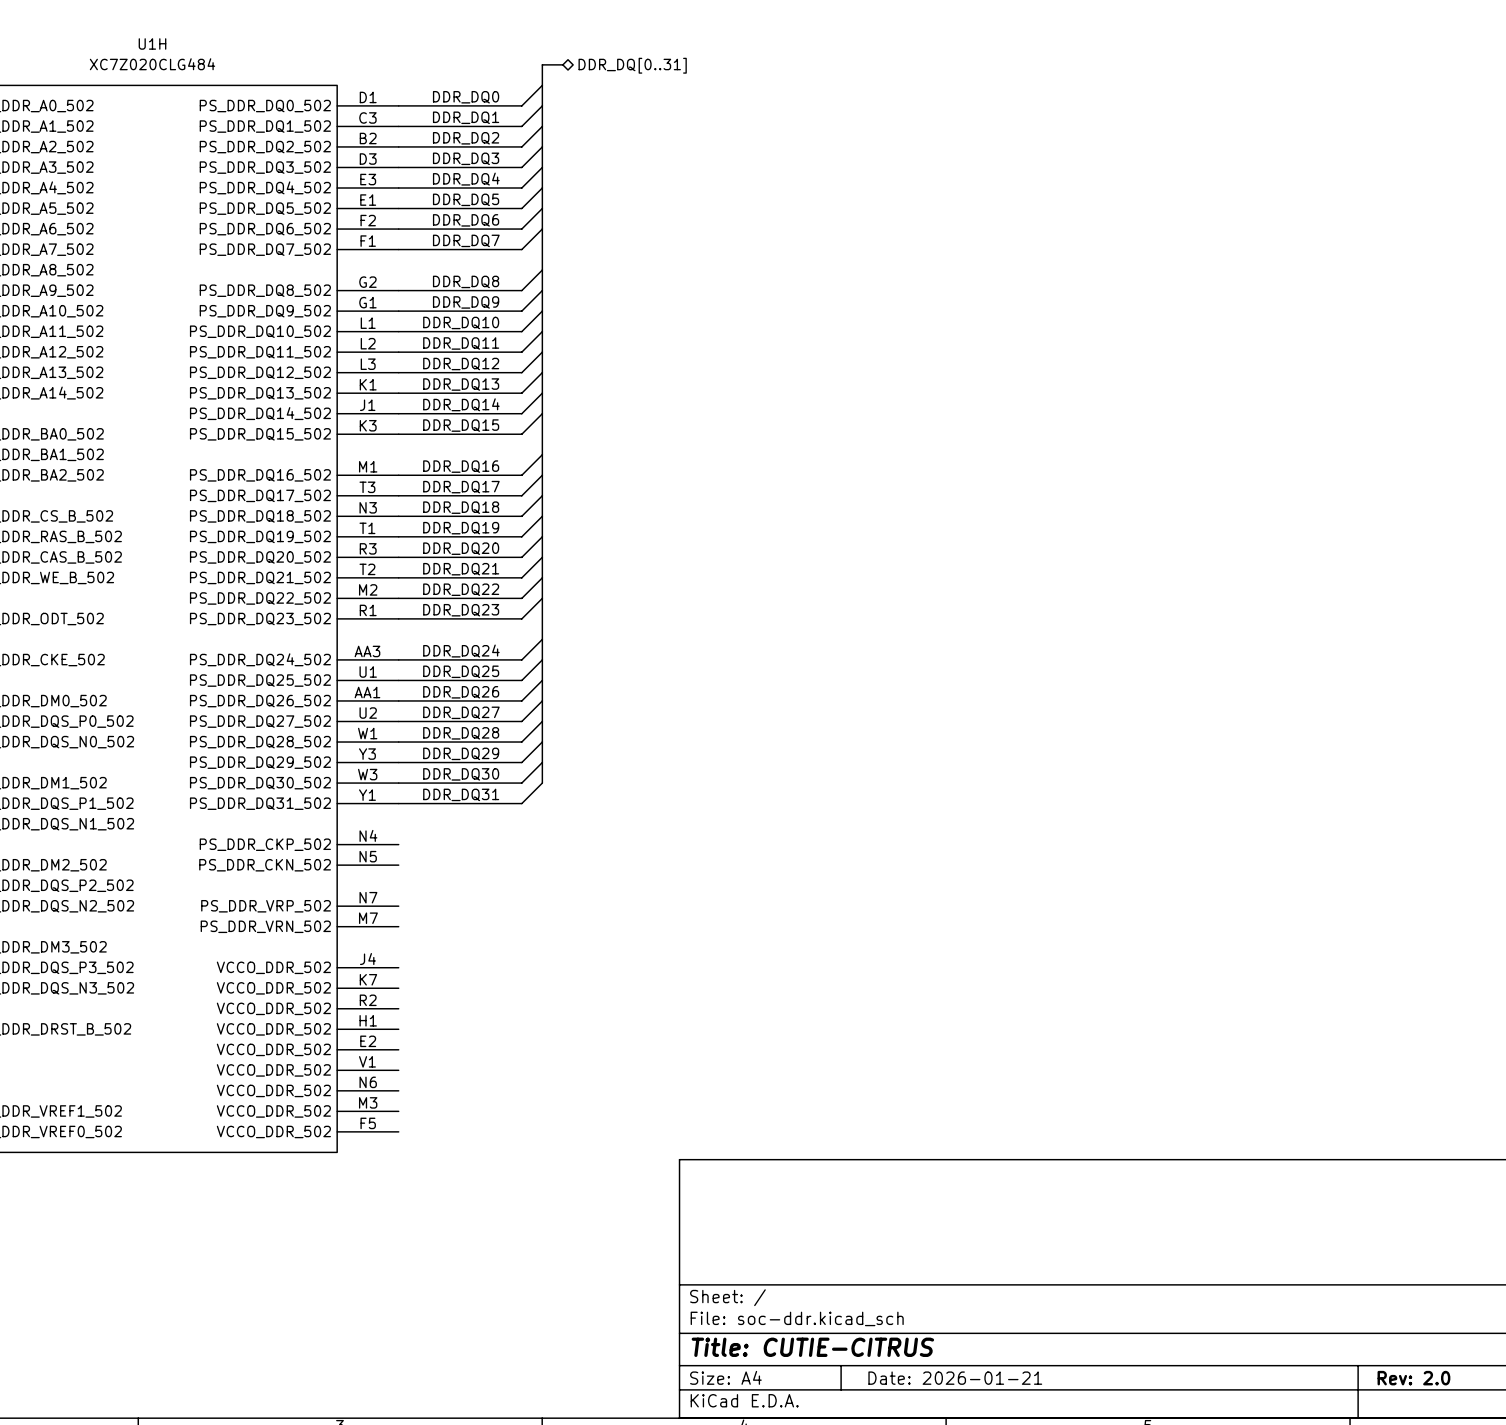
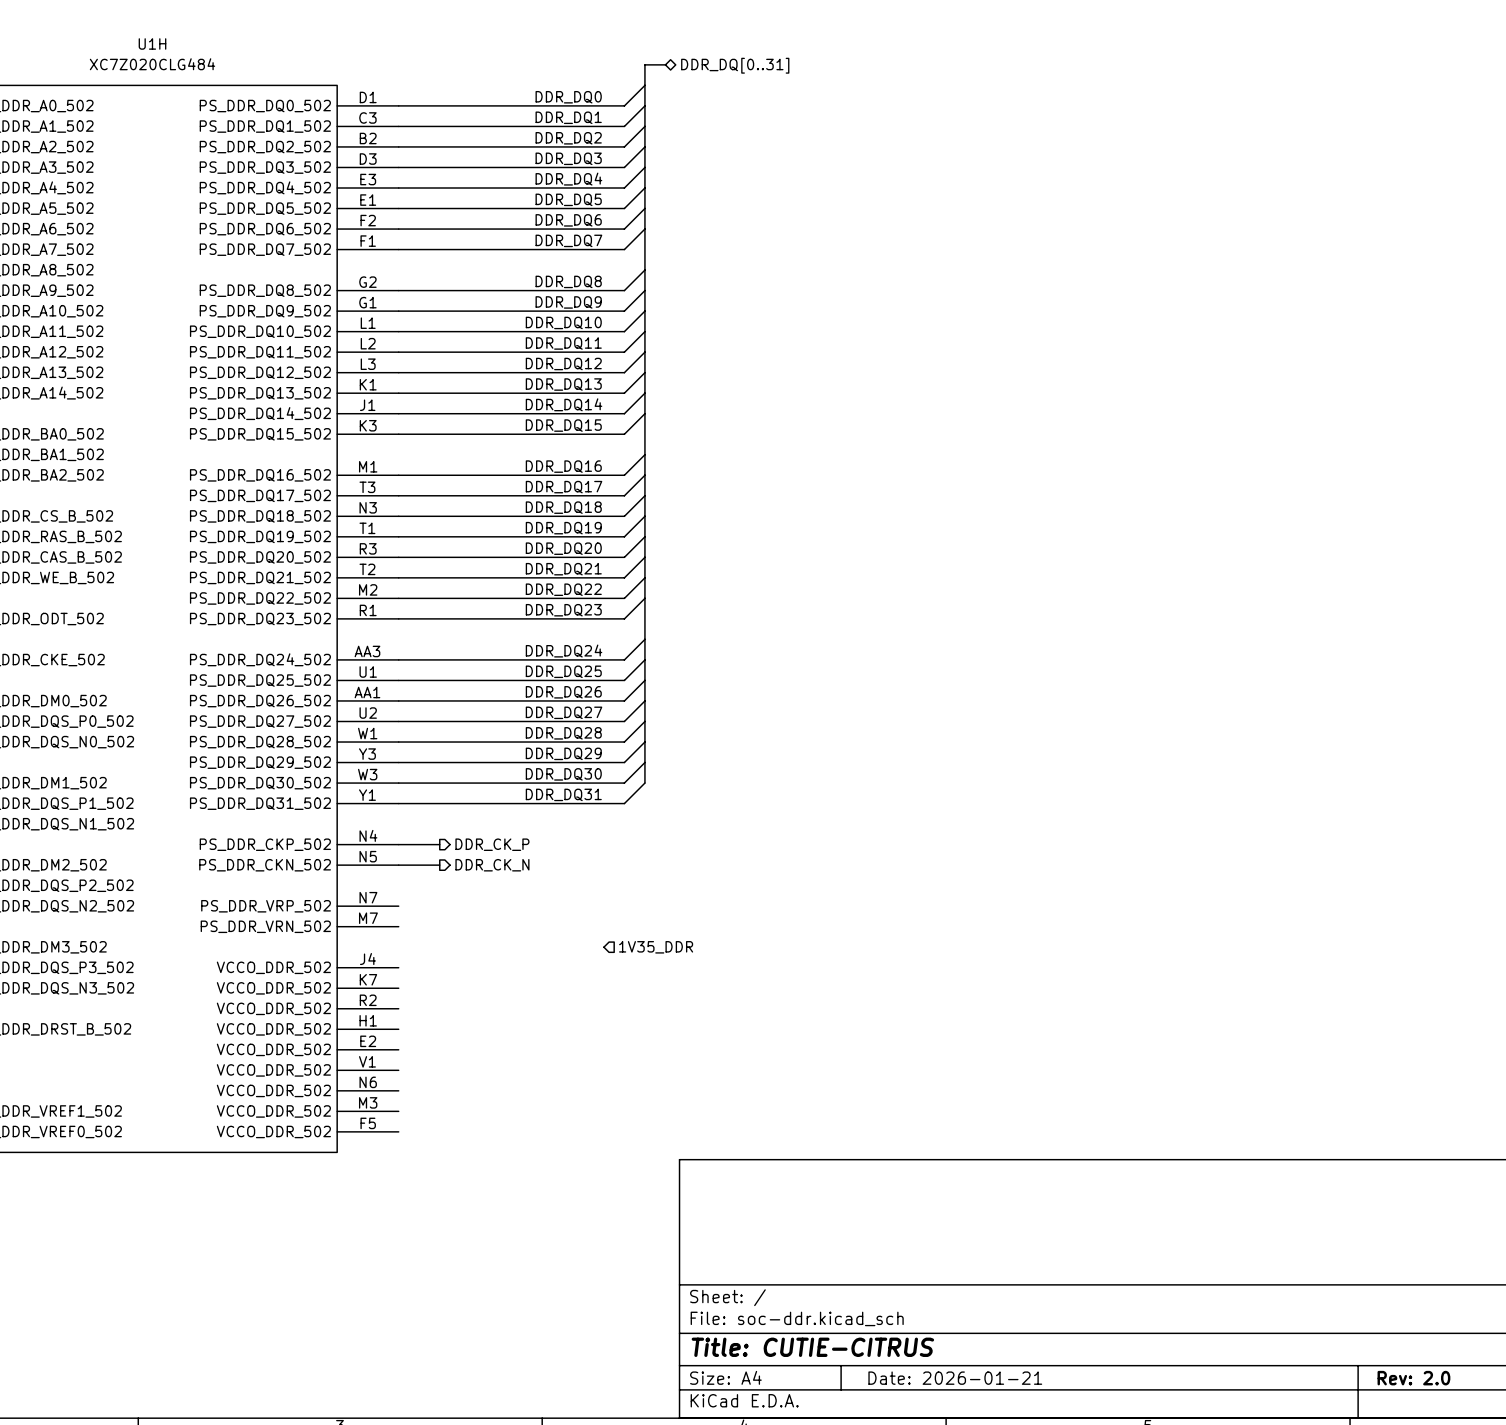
bus: (562, 64) (542, 64) (542, 783) -> (665, 64) (644, 64) (644, 783)
hierarchical label position: DDR_DQ[0..31] (632, 65) -> DDR_DQ[0..31] (735, 65)
wire: (542, 85) (521, 105) -> (644, 85) (624, 105) (521, 105)
label position: DDR_DQ0 (466, 97) -> DDR_DQ0 (568, 97)
wire: (542, 105) (521, 126) -> (644, 105) (624, 126) (521, 126)
label position: DDR_DQ1 (466, 117) -> DDR_DQ1 (568, 117)
wire: (542, 126) (521, 146) -> (644, 126) (624, 146) (521, 146)
label position: DDR_DQ2 (466, 138) -> DDR_DQ2 (568, 138)
wire: (542, 146) (521, 167) -> (644, 146) (624, 167) (521, 167)
label position: DDR_DQ3 (466, 158) -> DDR_DQ3 (568, 158)
wire: (542, 167) (521, 188) -> (644, 167) (624, 188) (521, 188)
label position: DDR_DQ4 (466, 179) -> DDR_DQ4 (568, 179)
wire: (542, 188) (521, 208) -> (644, 188) (624, 208) (521, 208)
label position: DDR_DQ5 (466, 199) -> DDR_DQ5 (568, 199)
wire: (542, 208) (521, 229) -> (644, 208) (624, 229) (521, 229)
label position: DDR_DQ6 (466, 220) -> DDR_DQ6 (568, 220)
wire: (542, 229) (521, 249) -> (644, 229) (624, 249) (521, 249)
label position: DDR_DQ7 (466, 240) -> DDR_DQ7 (568, 240)
wire: (542, 270) (521, 290) -> (644, 270) (624, 290) (521, 290)
label position: DDR_DQ8 (466, 281) -> DDR_DQ8 (568, 281)
wire: (542, 290) (521, 311) -> (644, 290) (624, 311) (521, 311)
label position: DDR_DQ9 (466, 302) -> DDR_DQ9 (568, 302)
wire: (542, 311) (521, 331) -> (644, 311) (624, 331) (521, 331)
label position: DDR_DQ10 (461, 322) -> DDR_DQ10 (563, 322)
wire: (542, 331) (521, 352) -> (644, 331) (624, 352) (521, 352)
label position: DDR_DQ11 (461, 343) -> DDR_DQ11 (563, 343)
wire: (542, 352) (521, 372) -> (644, 352) (624, 372) (521, 372)
label position: DDR_DQ12 (461, 364) -> DDR_DQ12 (563, 364)
wire: (542, 372) (521, 393) -> (644, 372) (624, 393) (521, 393)
label position: DDR_DQ13 (461, 384) -> DDR_DQ13 (563, 384)
wire: (542, 393) (521, 413) -> (644, 393) (624, 413) (521, 413)
label position: DDR_DQ14 (461, 404) -> DDR_DQ14 (564, 404)
wire: (542, 413) (521, 434) -> (644, 413) (624, 434) (521, 434)
label position: DDR_DQ15 (461, 425) -> DDR_DQ15 (563, 425)
wire: (542, 454) (521, 475) -> (644, 454) (624, 475) (521, 475)
label position: DDR_DQ16 (461, 466) -> DDR_DQ16 (563, 466)
wire: (542, 475) (521, 495) -> (644, 475) (624, 495) (521, 495)
label position: DDR_DQ17 (461, 487) -> DDR_DQ17 (564, 487)
wire: (542, 495) (521, 516) -> (644, 495) (624, 516) (521, 516)
label position: DDR_DQ18 (461, 507) -> DDR_DQ18 (563, 507)
wire: (542, 516) (521, 536) -> (644, 516) (624, 536) (521, 536)
label position: DDR_DQ19 (461, 528) -> DDR_DQ19 (563, 528)
wire: (542, 536) (521, 557) -> (644, 536) (624, 557) (521, 557)
label position: DDR_DQ20 (461, 548) -> DDR_DQ20 (563, 548)
wire: (542, 557) (521, 577) -> (644, 557) (624, 577) (521, 577)
label position: DDR_DQ21 (461, 569) -> DDR_DQ21 (563, 569)
wire: (542, 577) (521, 598) -> (644, 577) (624, 598) (521, 598)
label position: DDR_DQ22 (461, 589) -> DDR_DQ22 (563, 589)
wire: (542, 598) (521, 618) -> (644, 598) (624, 618) (521, 618)
label position: DDR_DQ23 (461, 610) -> DDR_DQ23 (563, 610)
wire: (542, 639) (521, 659) -> (644, 639) (624, 659) (521, 659)
label position: DDR_DQ24 (461, 651) -> DDR_DQ24 (564, 651)
wire: (542, 659) (521, 680) -> (644, 659) (624, 680) (521, 680)
label position: DDR_DQ25 (461, 671) -> DDR_DQ25 (563, 671)
wire: (542, 680) (521, 700) -> (644, 680) (624, 700) (521, 700)
label position: DDR_DQ26 (461, 692) -> DDR_DQ26 (563, 692)
wire: (542, 700) (521, 721) -> (644, 700) (624, 721) (521, 721)
label position: DDR_DQ27 (461, 712) -> DDR_DQ27 (564, 712)
wire: (542, 721) (521, 742) -> (644, 721) (624, 742) (521, 742)
label position: DDR_DQ28 (461, 733) -> DDR_DQ28 (563, 733)
wire: (542, 742) (521, 762) -> (644, 742) (624, 762) (521, 762)
label position: DDR_DQ29 (461, 753) -> DDR_DQ29 (563, 753)
wire: (542, 762) (521, 783) -> (644, 762) (624, 783) (521, 783)
label position: DDR_DQ30 (461, 774) -> DDR_DQ30 (563, 774)
wire: (542, 783) (521, 803) -> (644, 783) (624, 803) (521, 803)
label position: DDR_DQ31 (461, 794) -> DDR_DQ31 (563, 794)
wire: none -> (398, 844) (439, 844)
hierarchical label: none -> DDR_CK_P (492, 844)
wire: none -> (398, 865) (439, 865)
hierarchical label: none -> DDR_CK_N (492, 865)
hierarchical label: none -> 1V35_DDR (656, 947)

